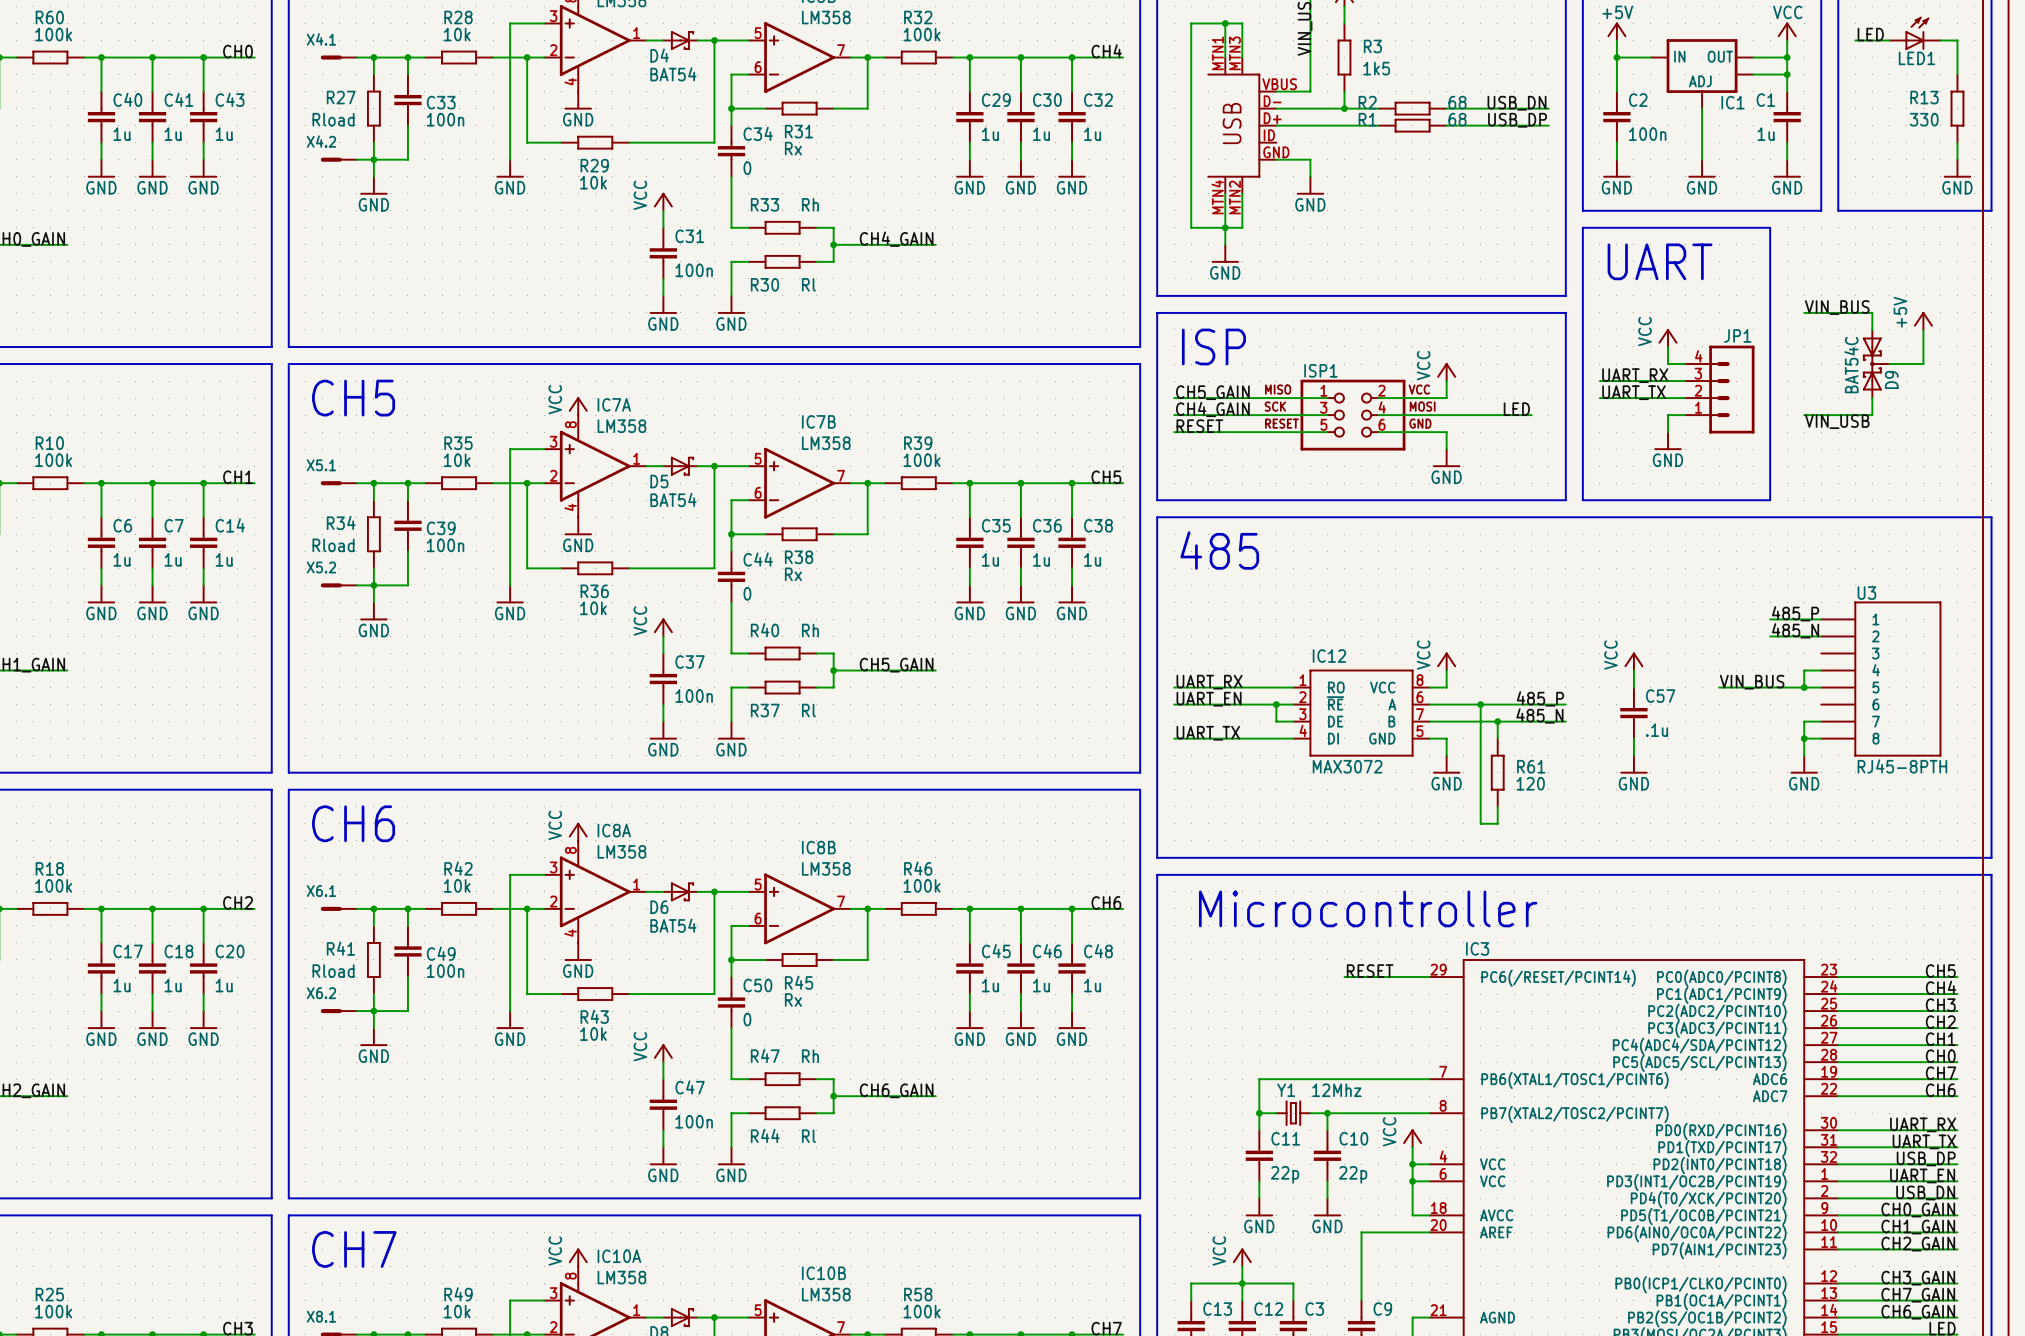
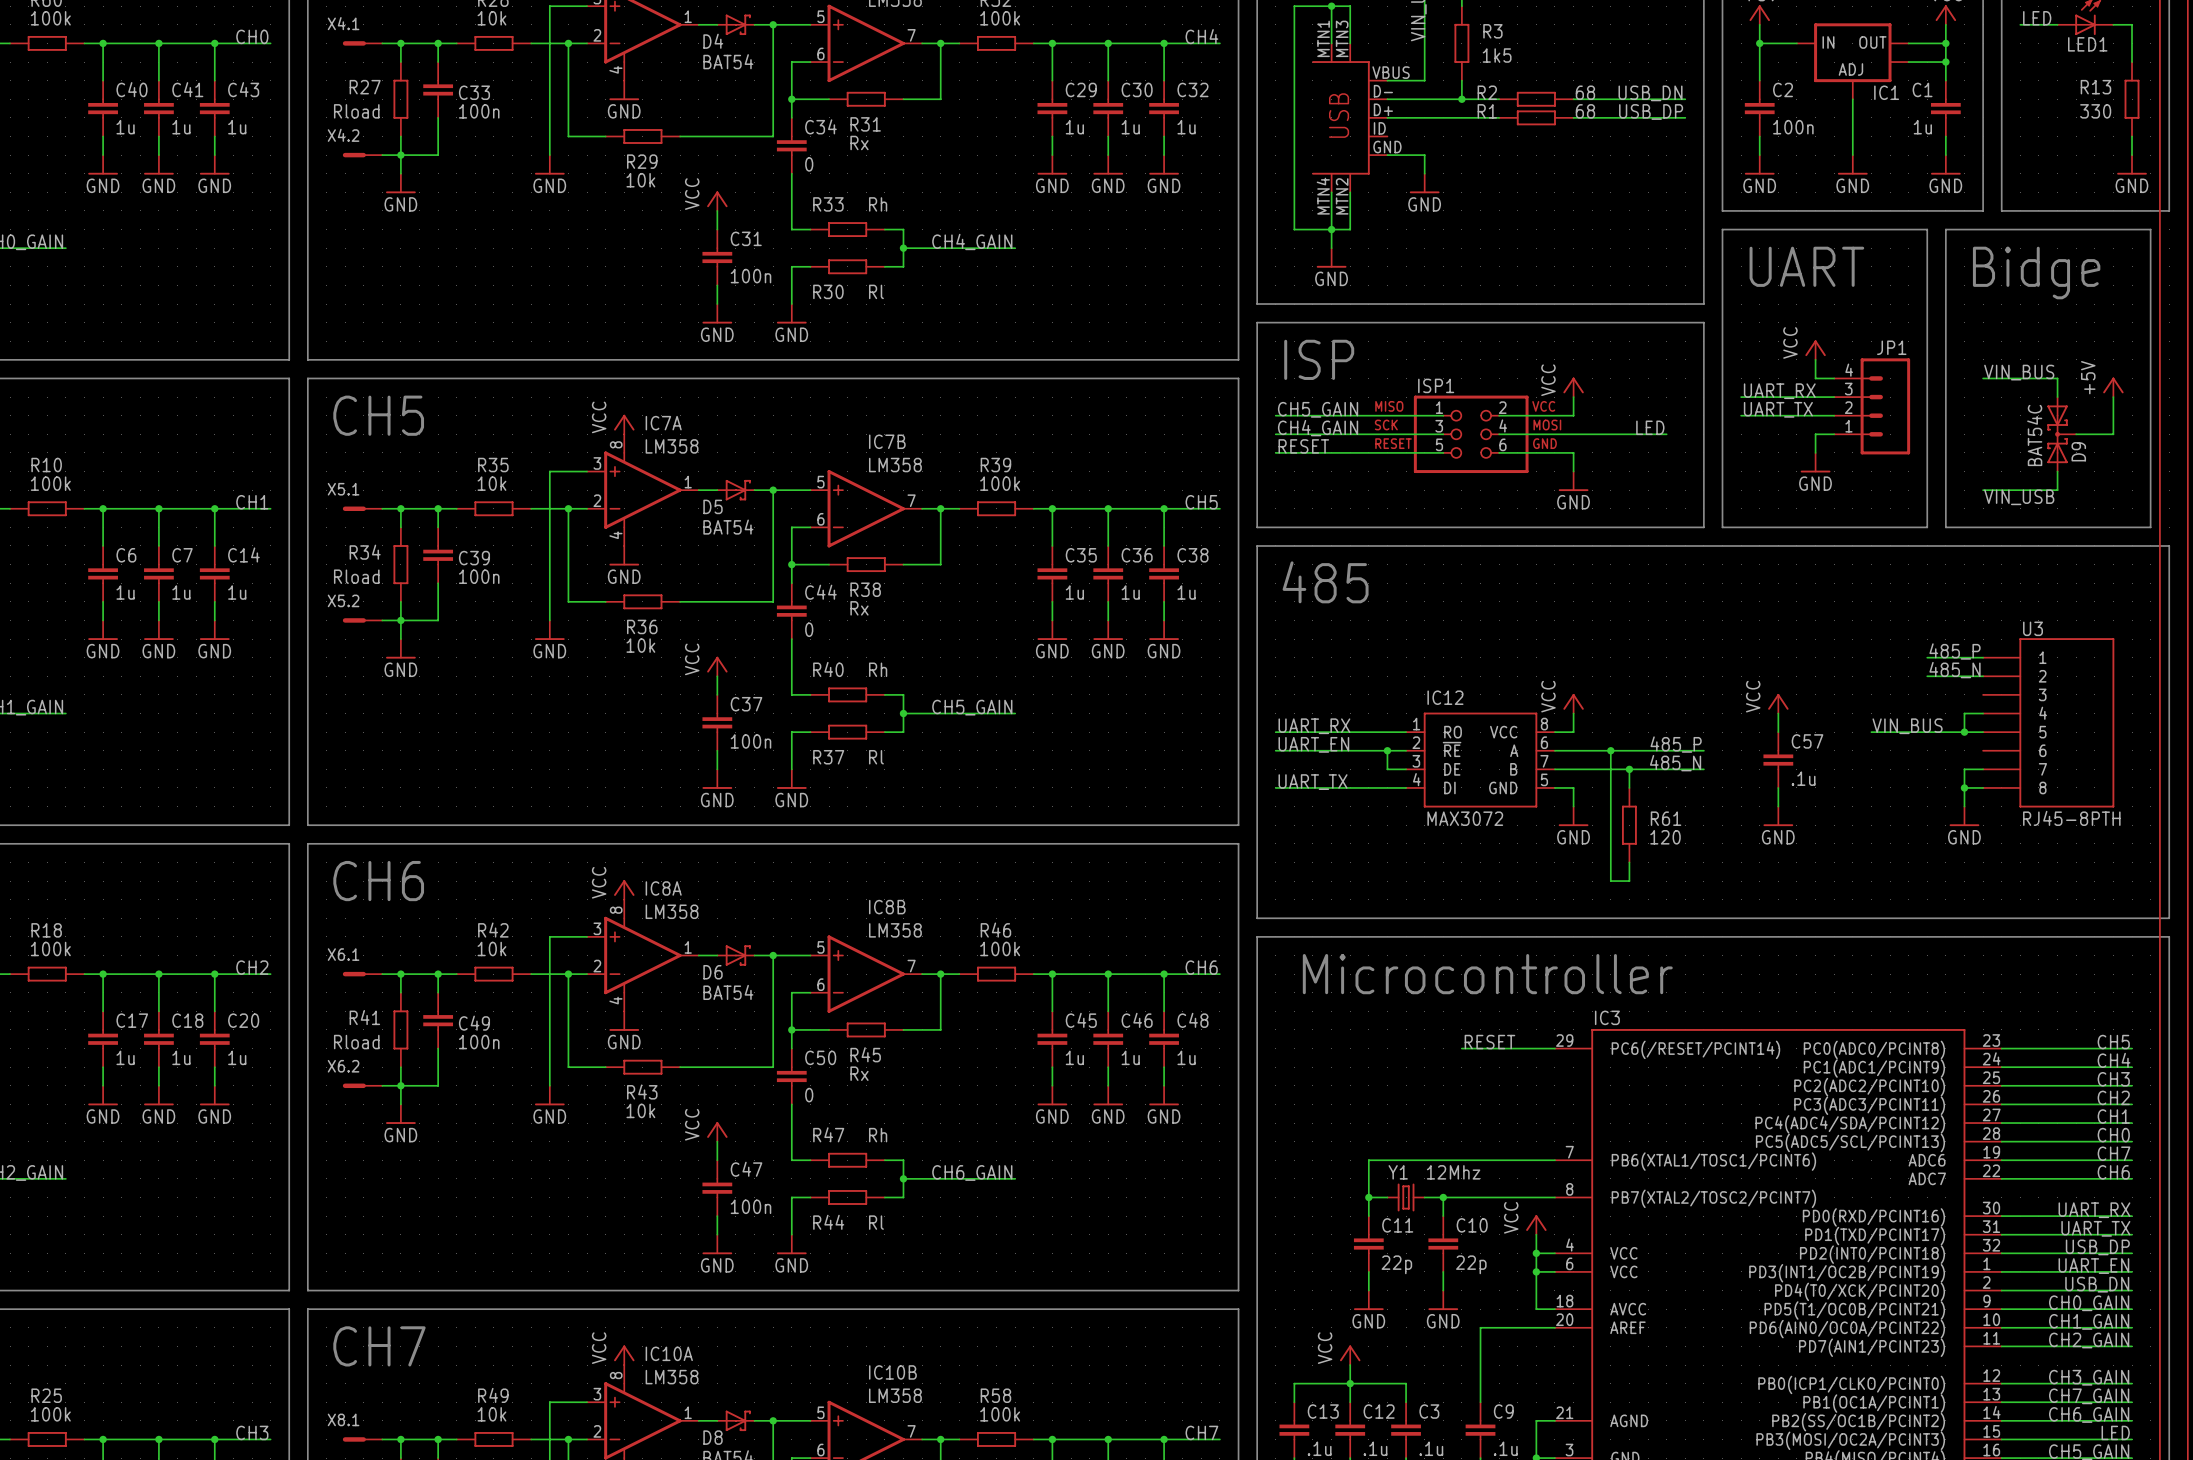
line: none -> (1945, 229) (1945, 527) (2150, 527) (2150, 229) (1945, 229)
text: none -> Bidge (2036, 272)
label position: VIN_BUS (1837, 307) -> VIN_BUS (2019, 372)
wire: (1804, 312) (1872, 312) (1872, 329) -> (1983, 378) (2057, 378) (2057, 397)
power symbol position: +5V (1923, 321) -> +5V (2113, 387)
wire: (1923, 329) (1923, 364) (1889, 364) -> (2113, 397) (2113, 434) (2076, 434)
D9 position: (1876, 364) -> (2061, 434)
wire: (1872, 398) (1872, 415) (1804, 415) -> (2057, 471) (2057, 490) (1983, 490)
label position: VIN_USB (1837, 421) -> VIN_USB (2019, 497)

